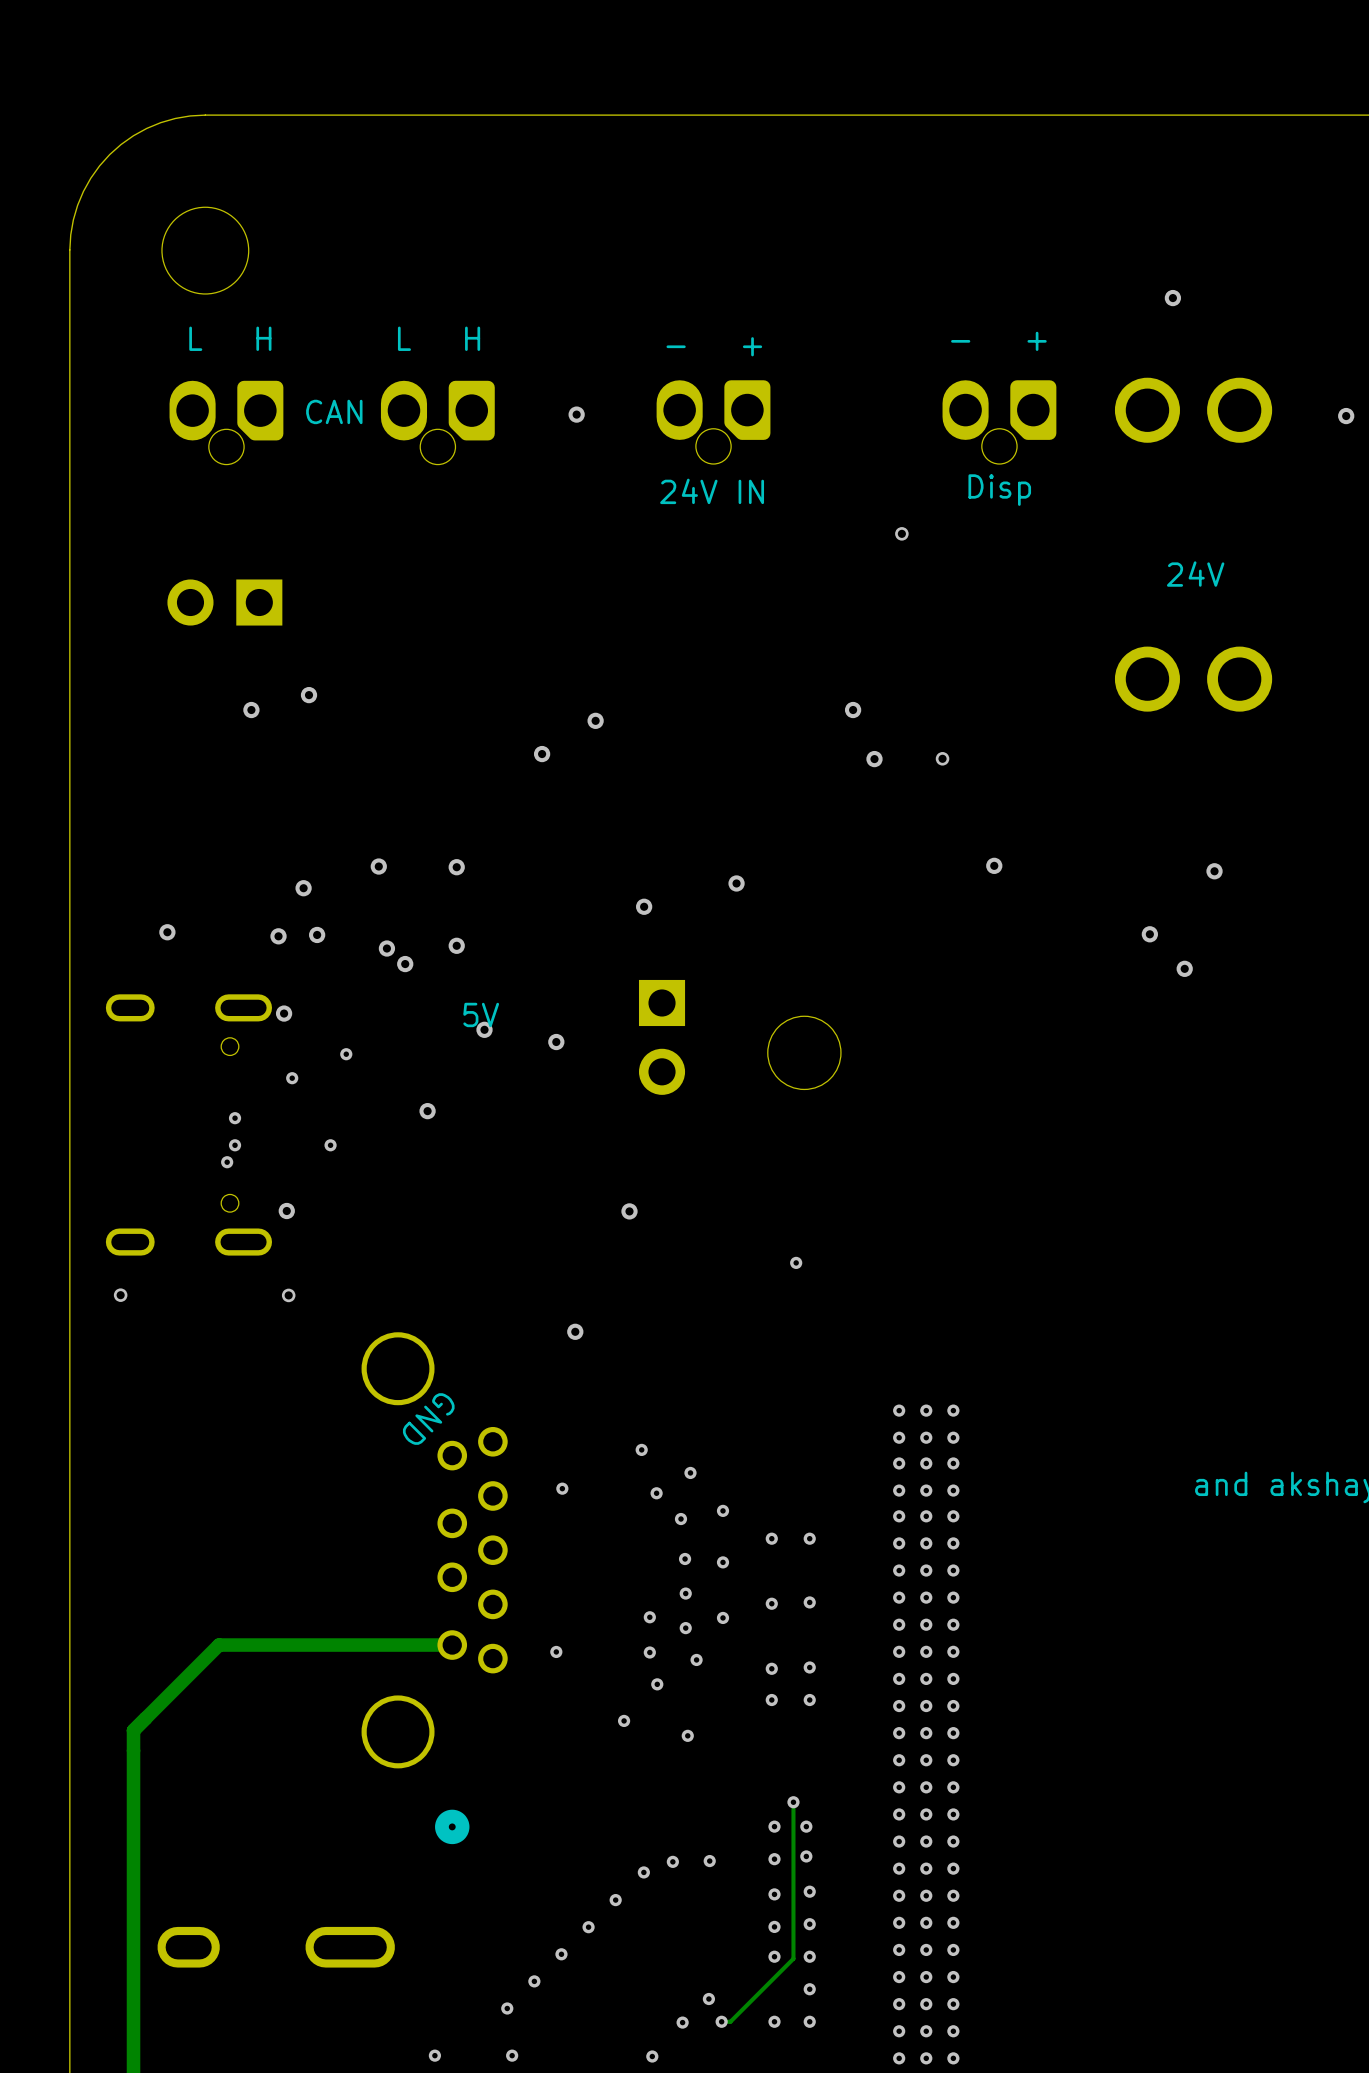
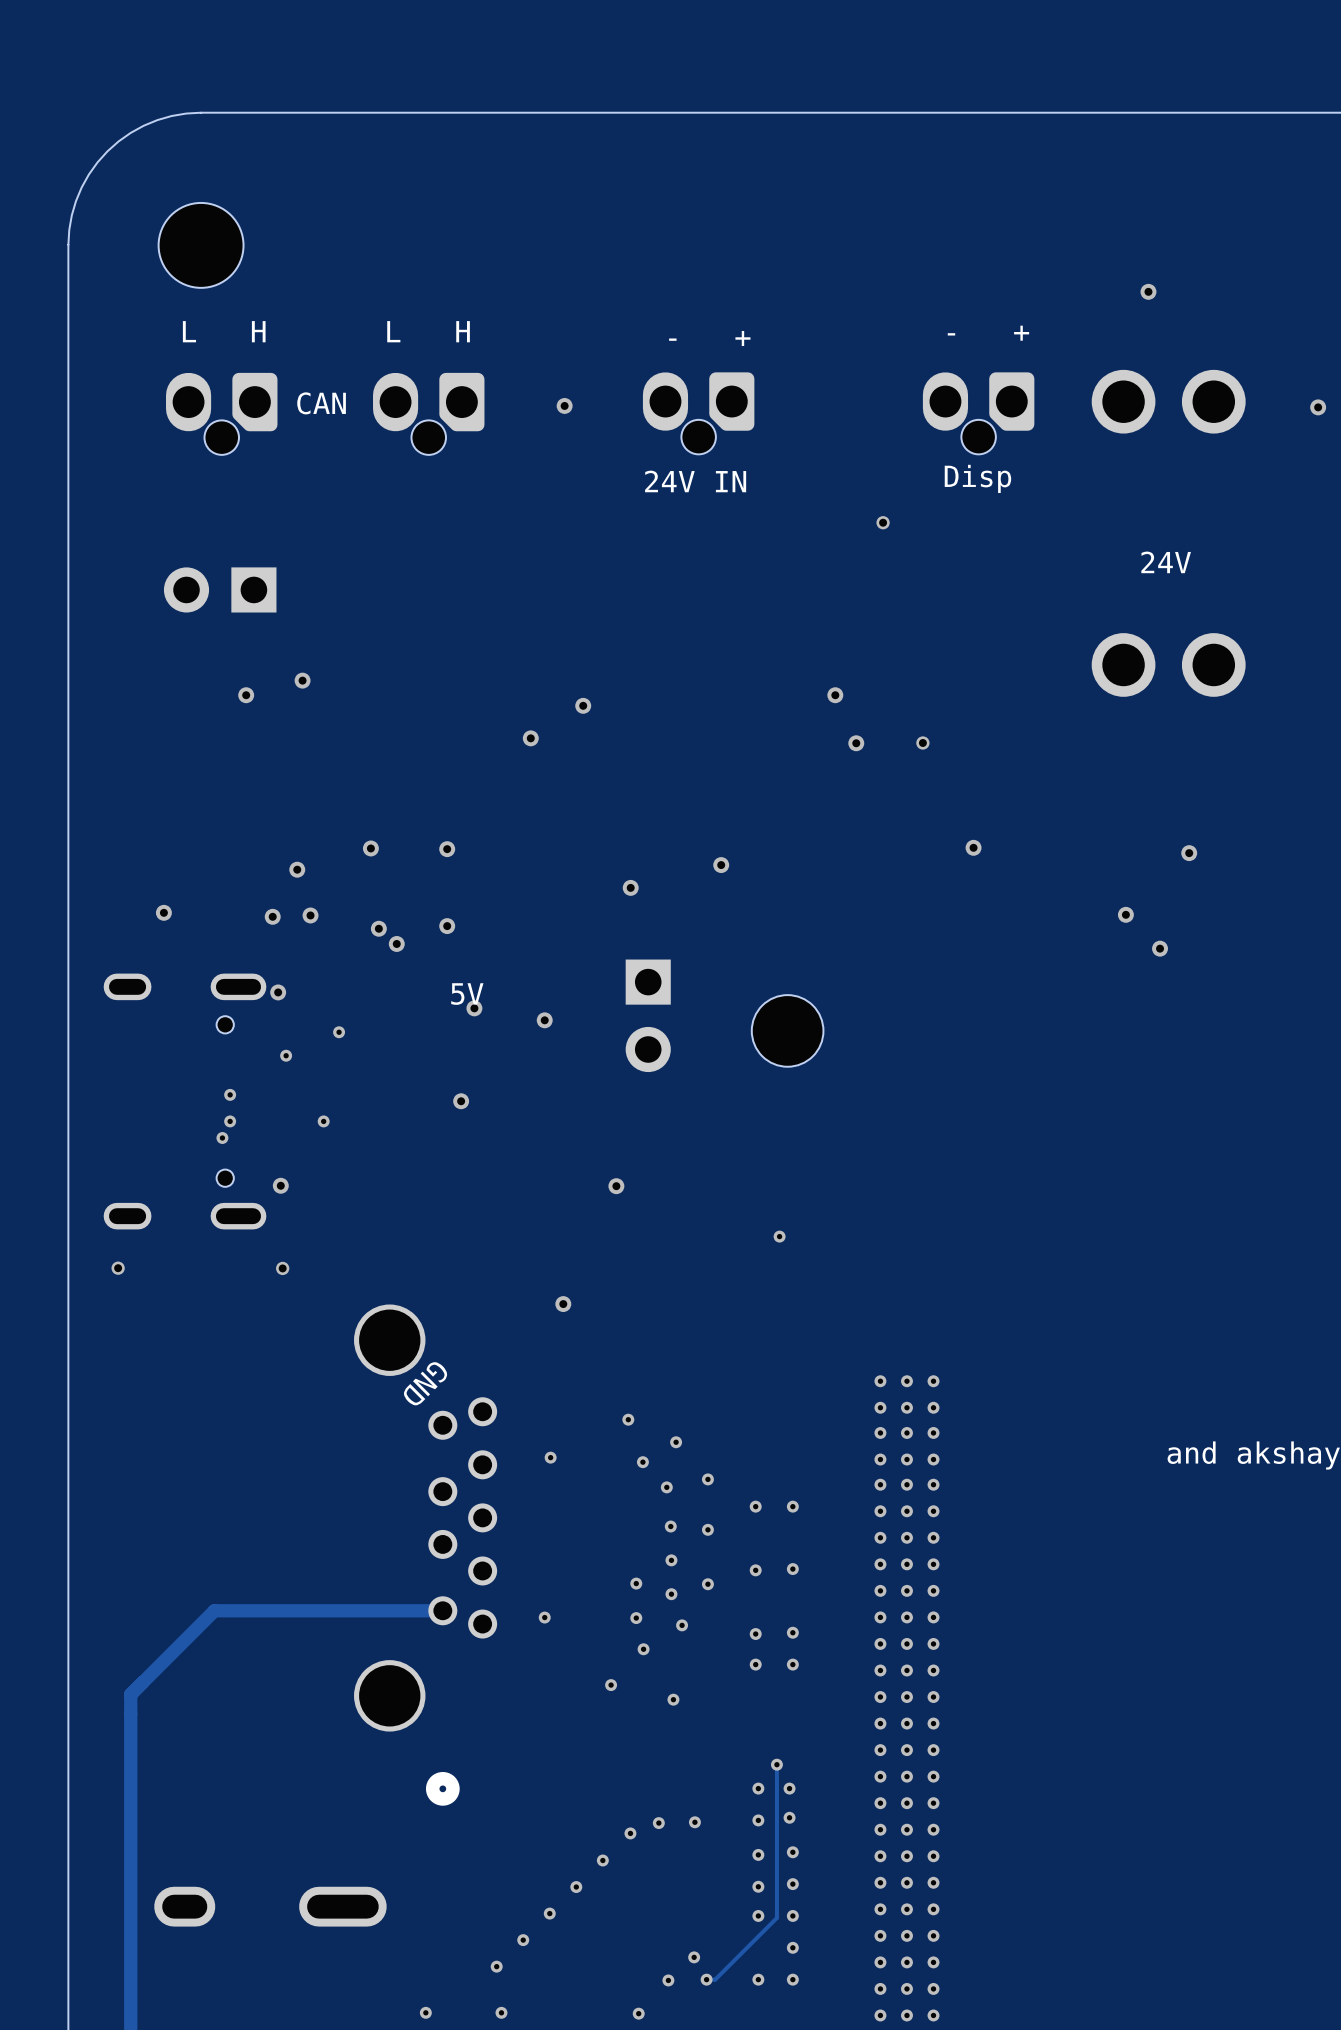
via position: (427, 1111) -> (461, 1101)

